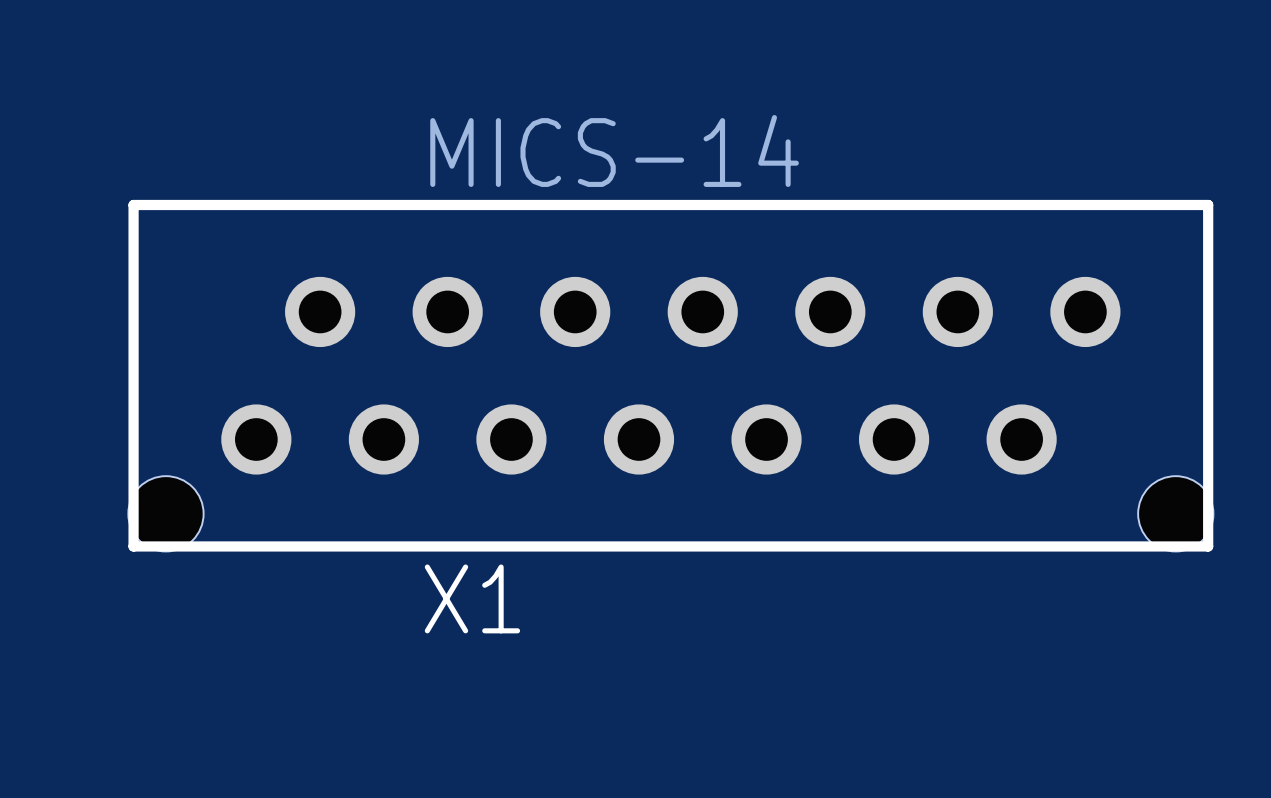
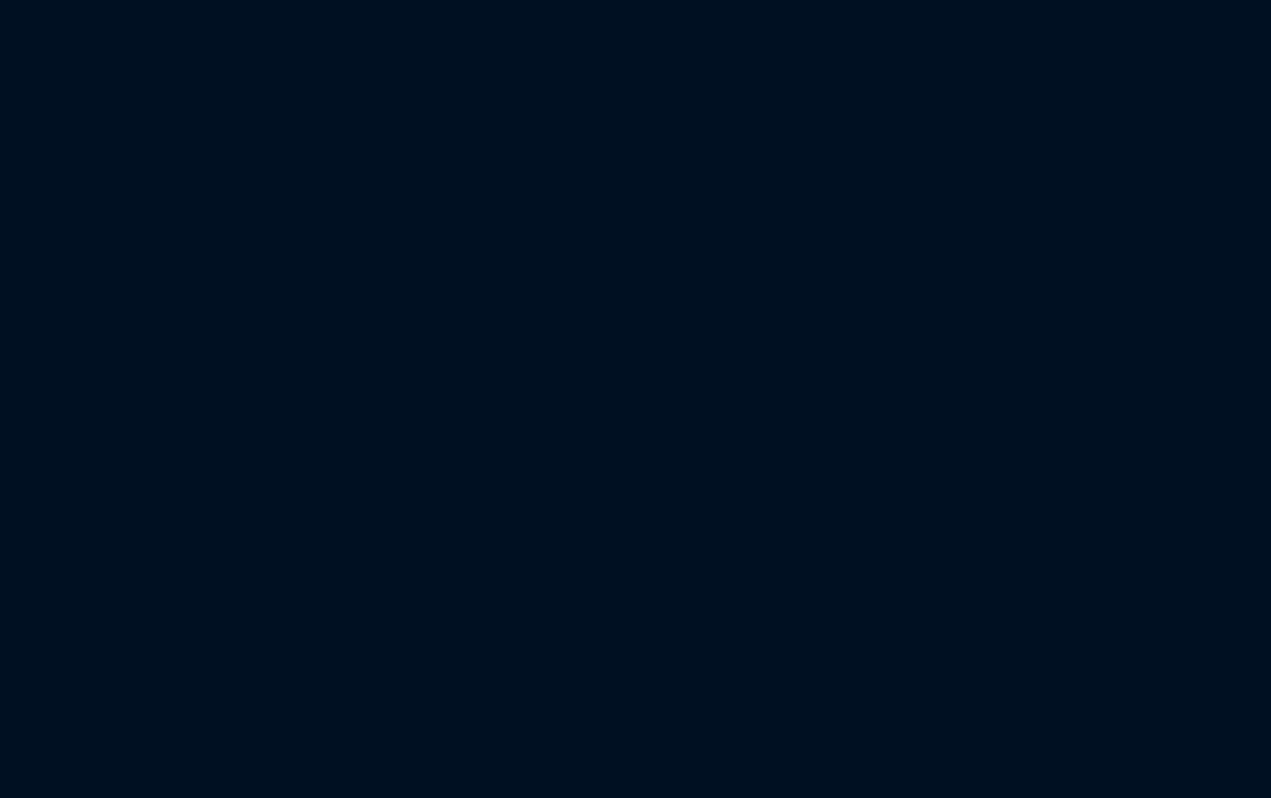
X1: MICS-14 (670, 375) -> none

